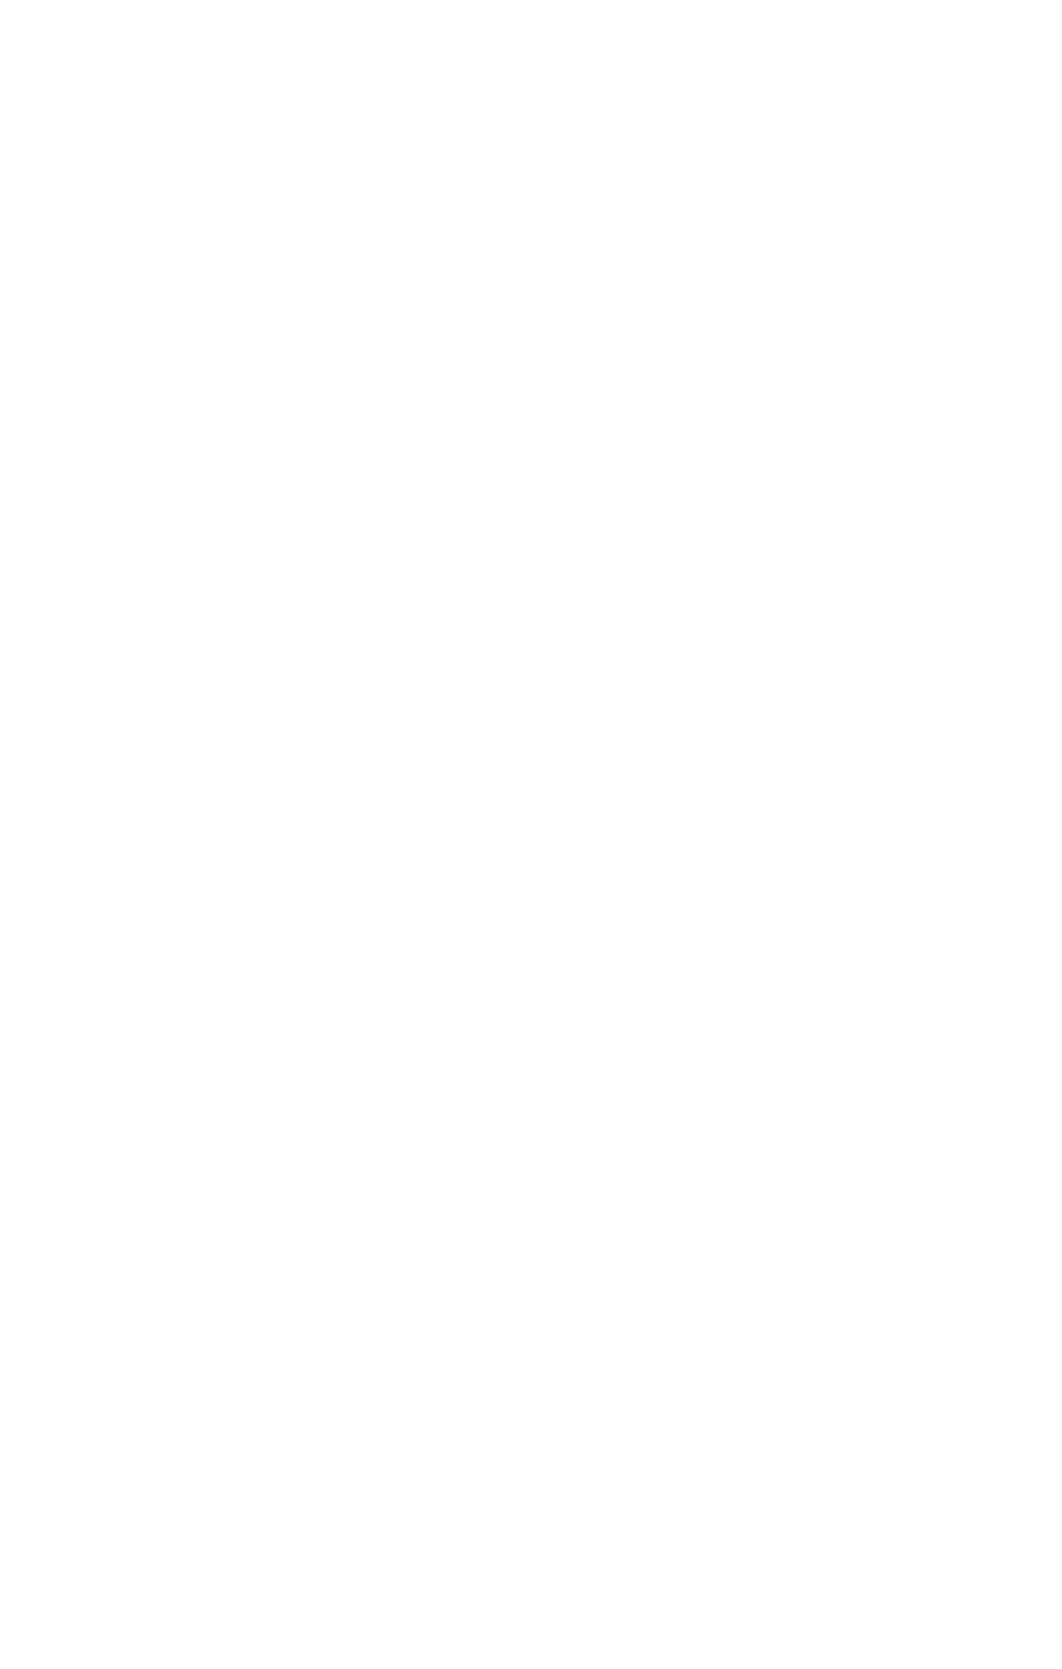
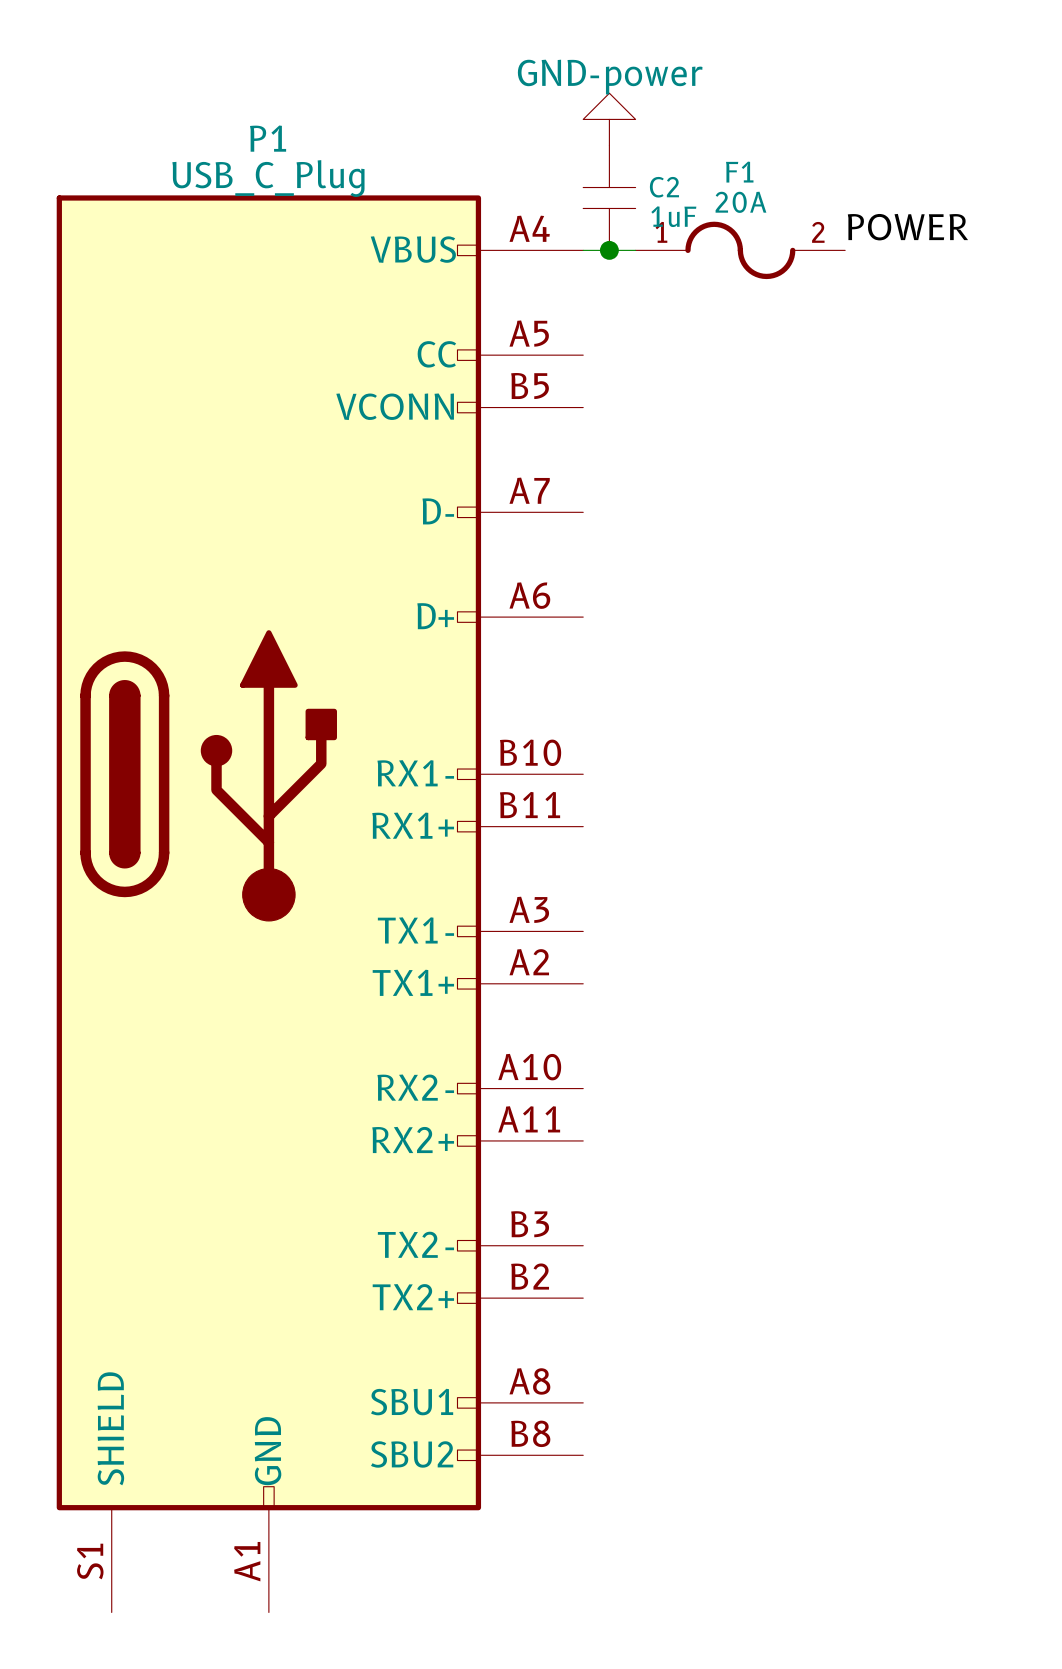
power symbol: none -> GND-power (609, 119)
C2: none -> 1uF (609, 197)
label: none -> POWER (907, 227)
wire: none -> (583, 250) (635, 250)
junction: none -> (609, 250)
F1: none -> 20A (740, 250)
P1: none -> USB_C_Plug (319, 903)

